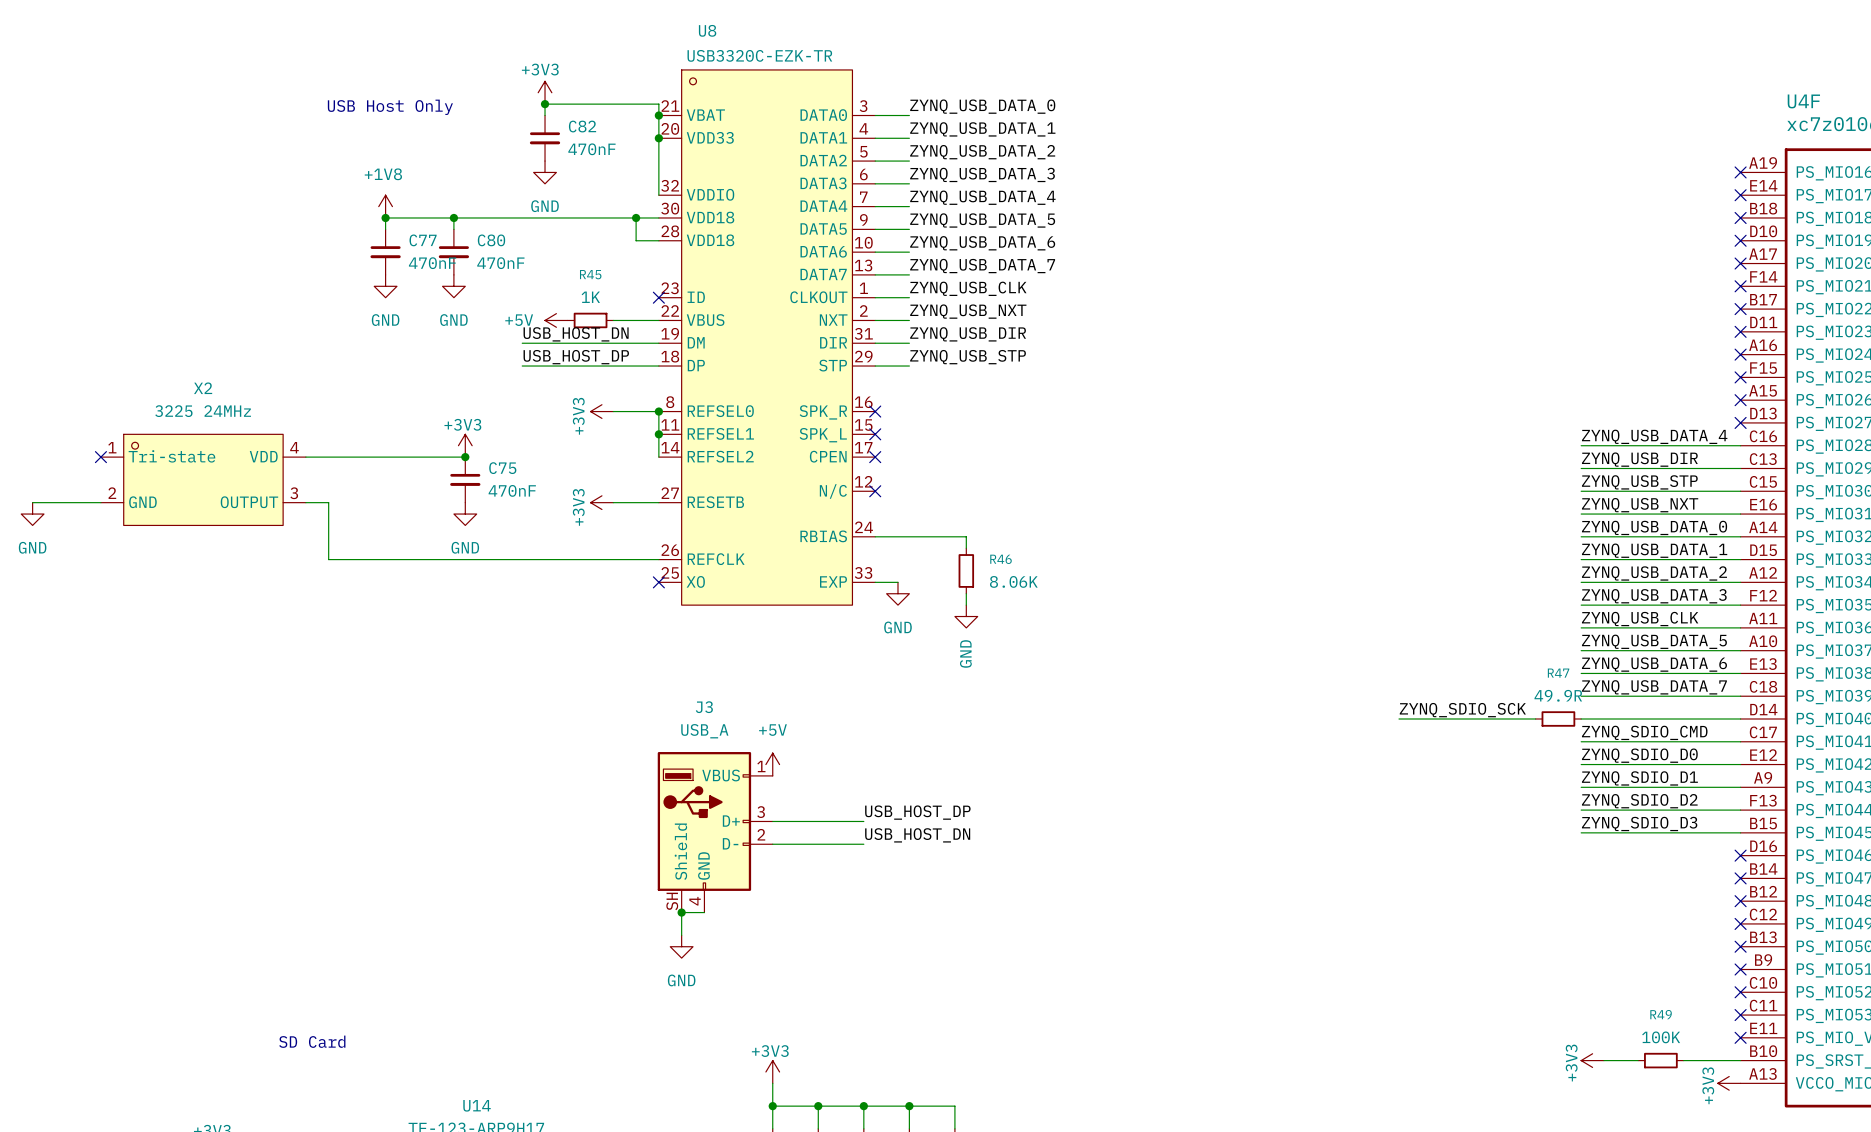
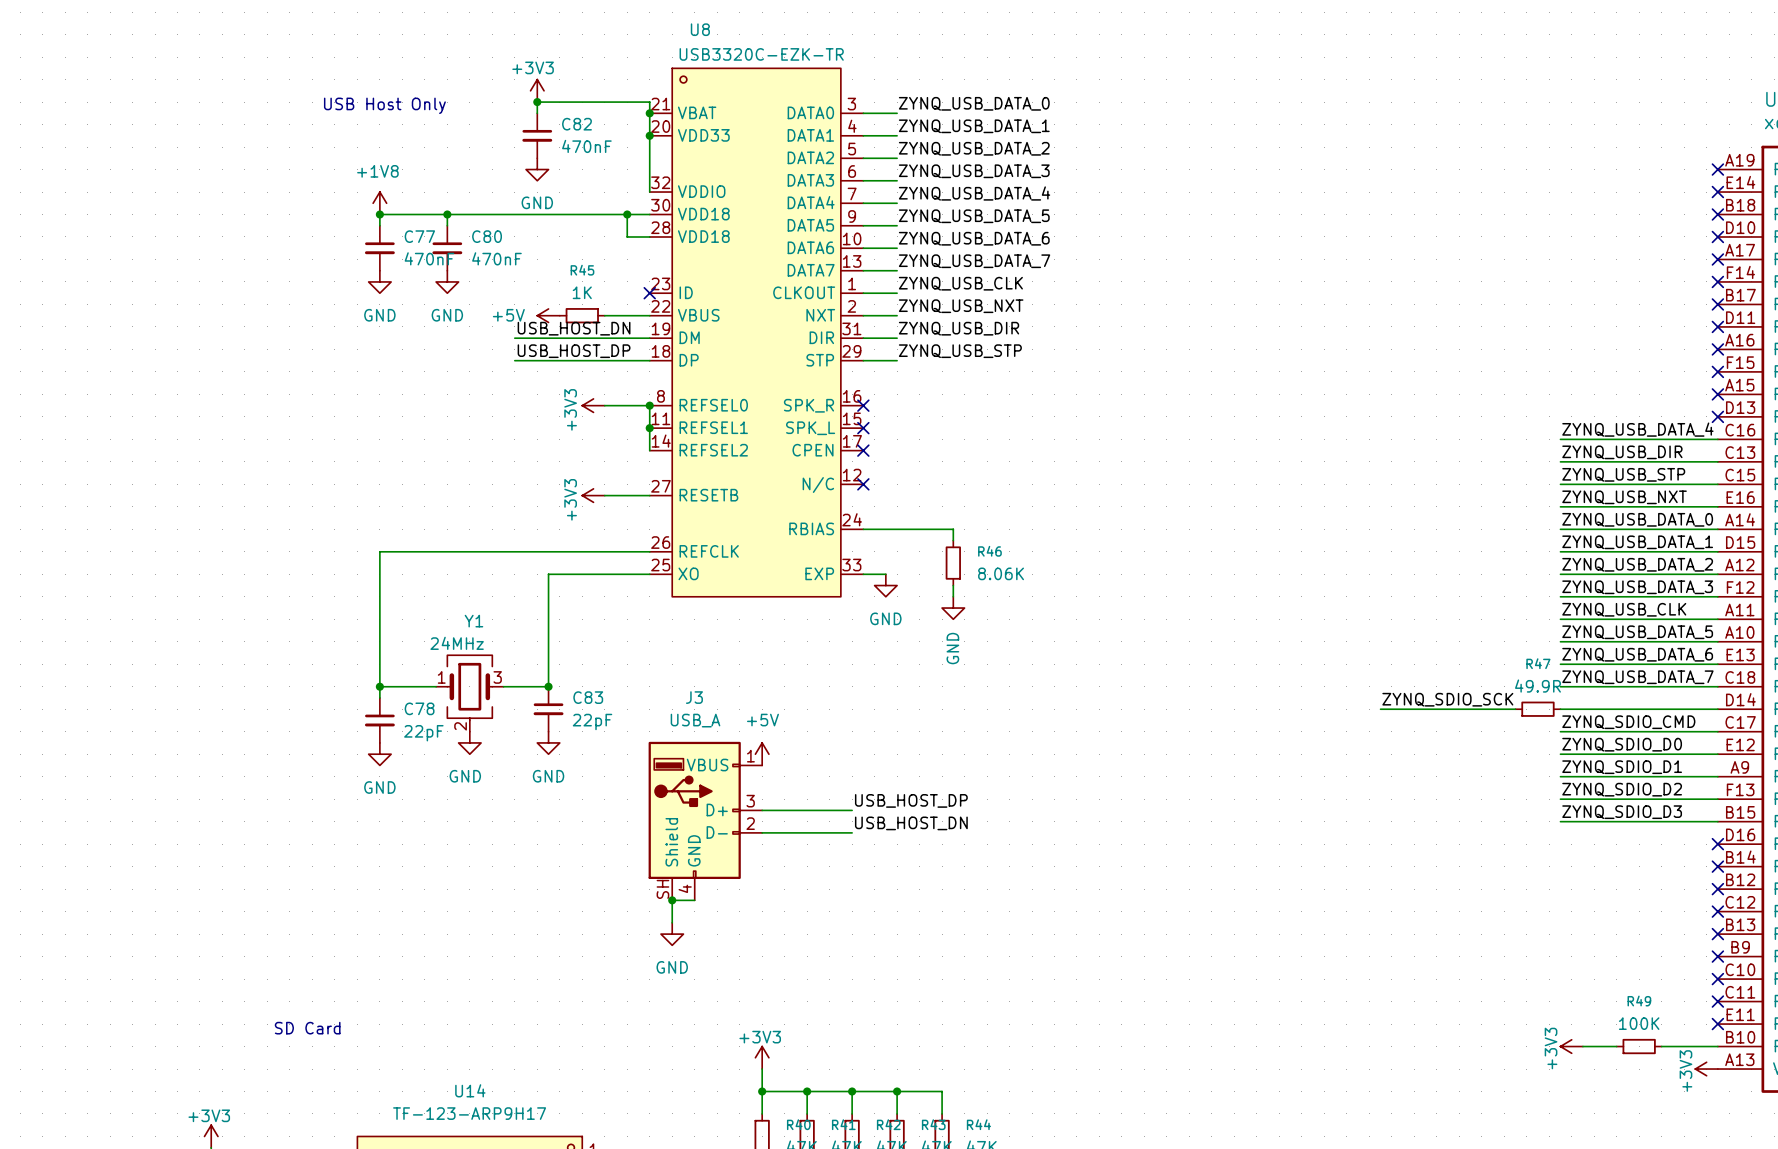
power symbol: +3V3 (465, 445) -> none
no-connect mark: (100, 457) -> none
wire: (305, 457) (465, 457) -> none
junction: (465, 457) -> none
X2: 3225 24MHz (203, 479) -> none
C75: 470nF (465, 479) -> none
wire: (32, 502) (100, 502) -> none
wire: (305, 502) (328, 502) (328, 559) (385, 559) -> (379, 697) (379, 551)
power symbol: GND (32, 514) -> none
power symbol: GND (465, 514) -> none
wire: none -> (649, 574) (548, 574) (548, 686) (503, 686)
no-connect mark: (658, 582) -> none
wire: none -> (379, 686) (436, 686)
junction: none -> (379, 686)
junction: none -> (548, 686)
Y1: none -> 24MHz (469, 693)
C83: none -> 22pF (548, 709)
C78: none -> 22pF (379, 720)
power symbol: none -> GND (469, 742)
power symbol: none -> GND (548, 742)
power symbol: none -> GND (379, 754)

